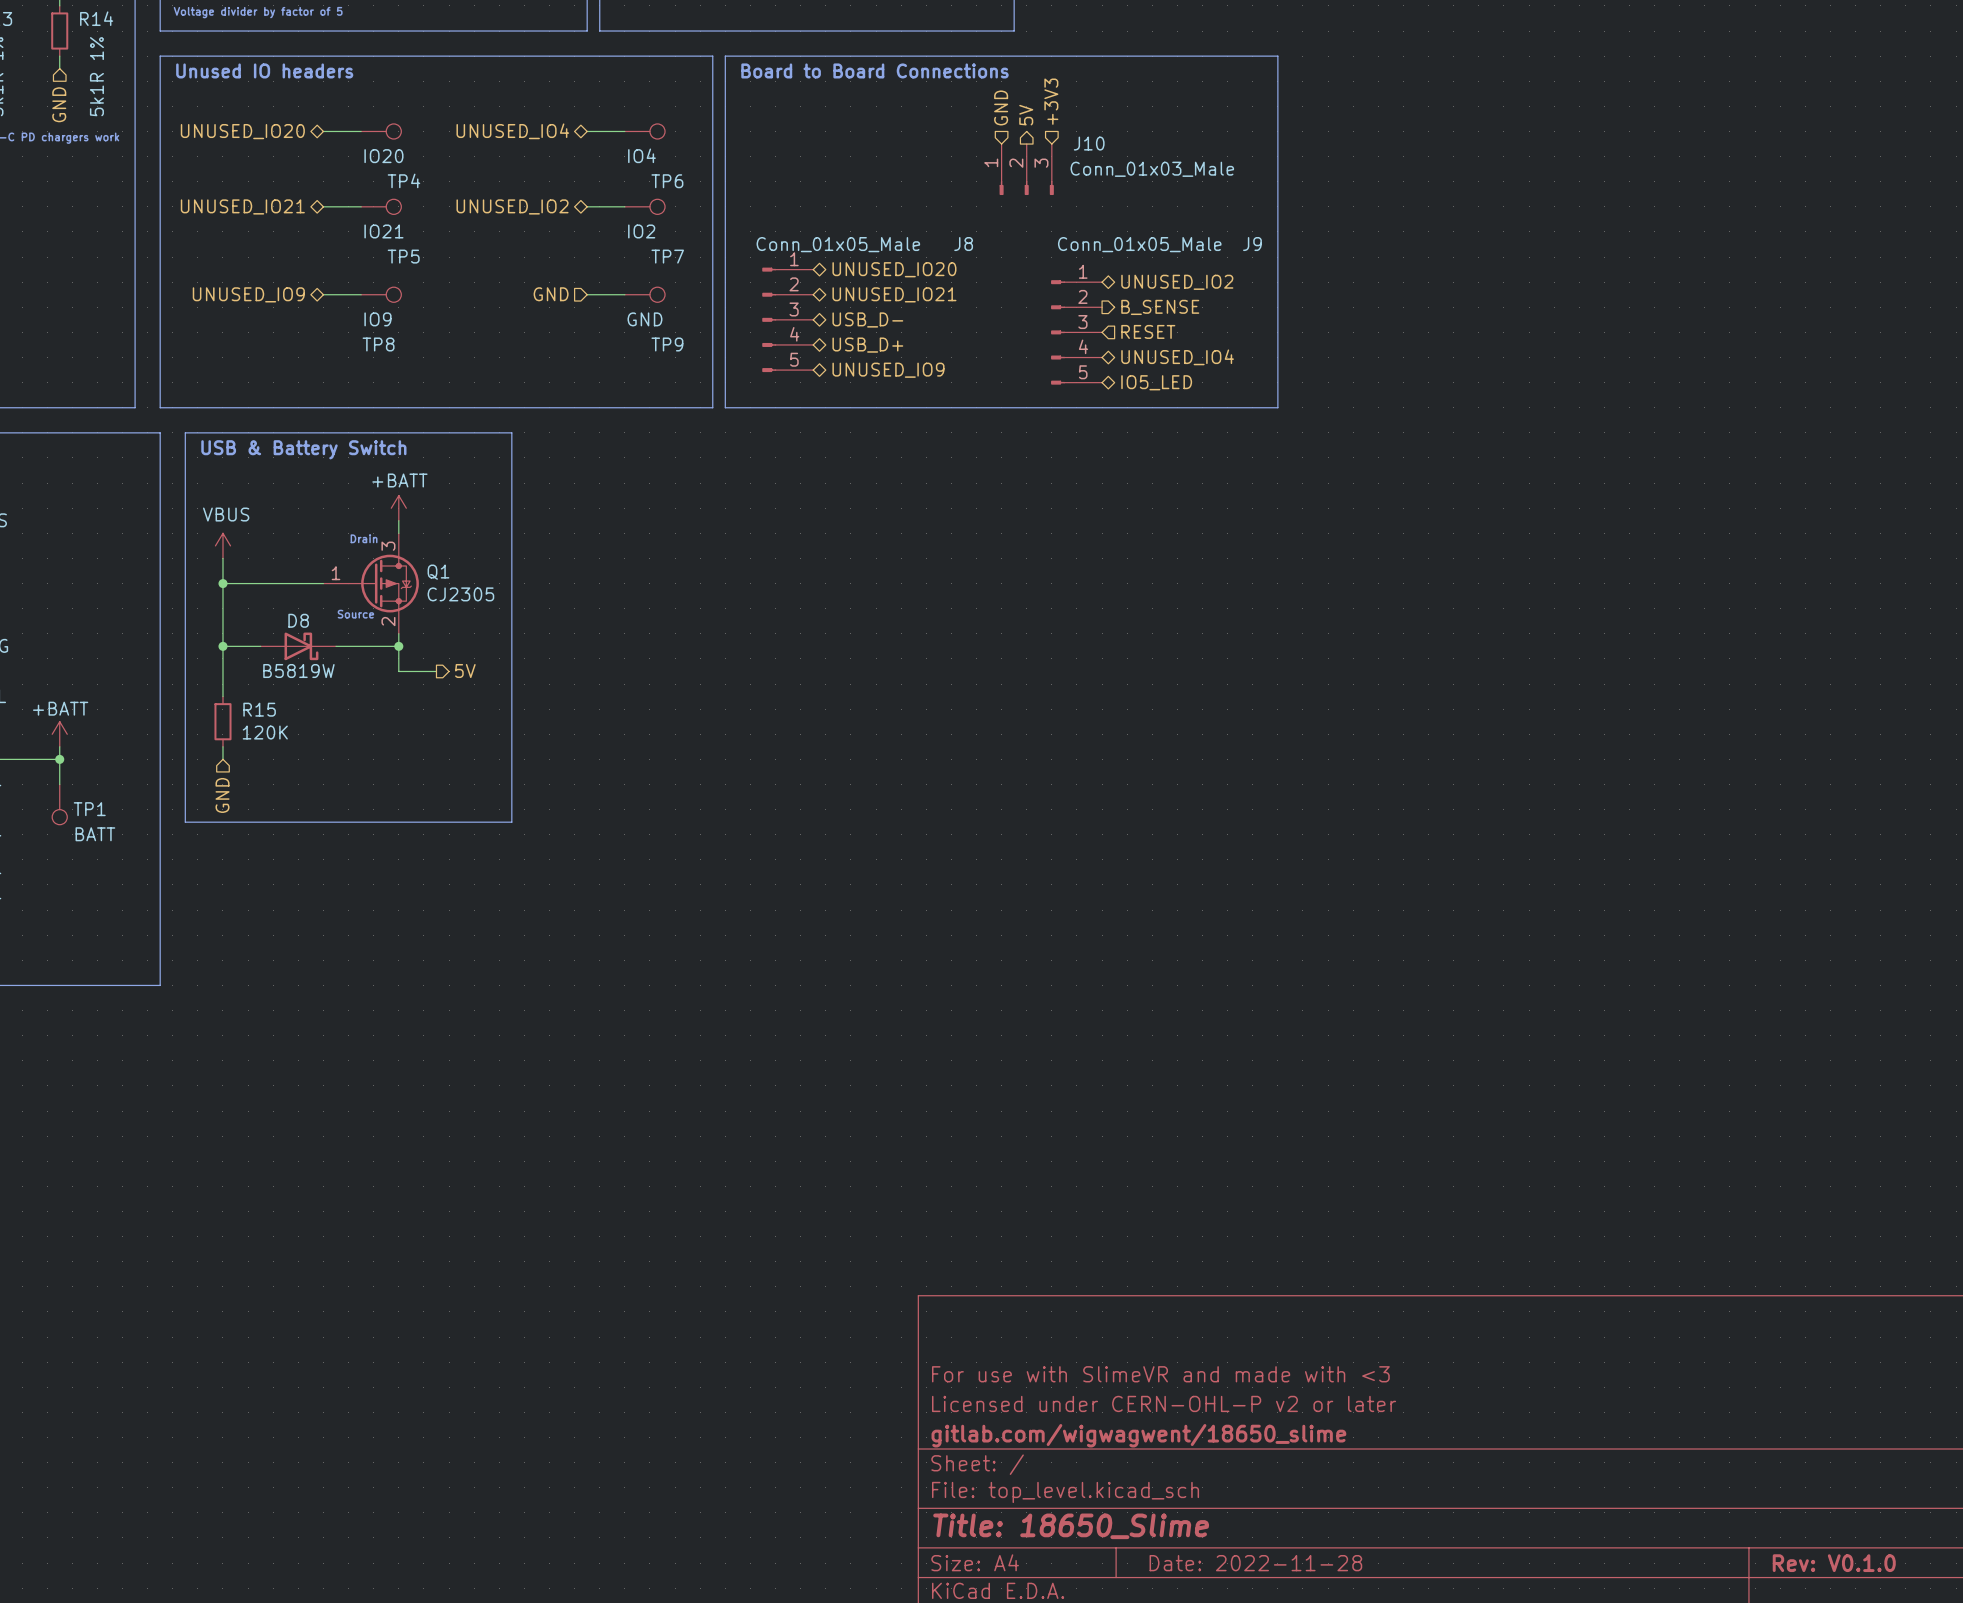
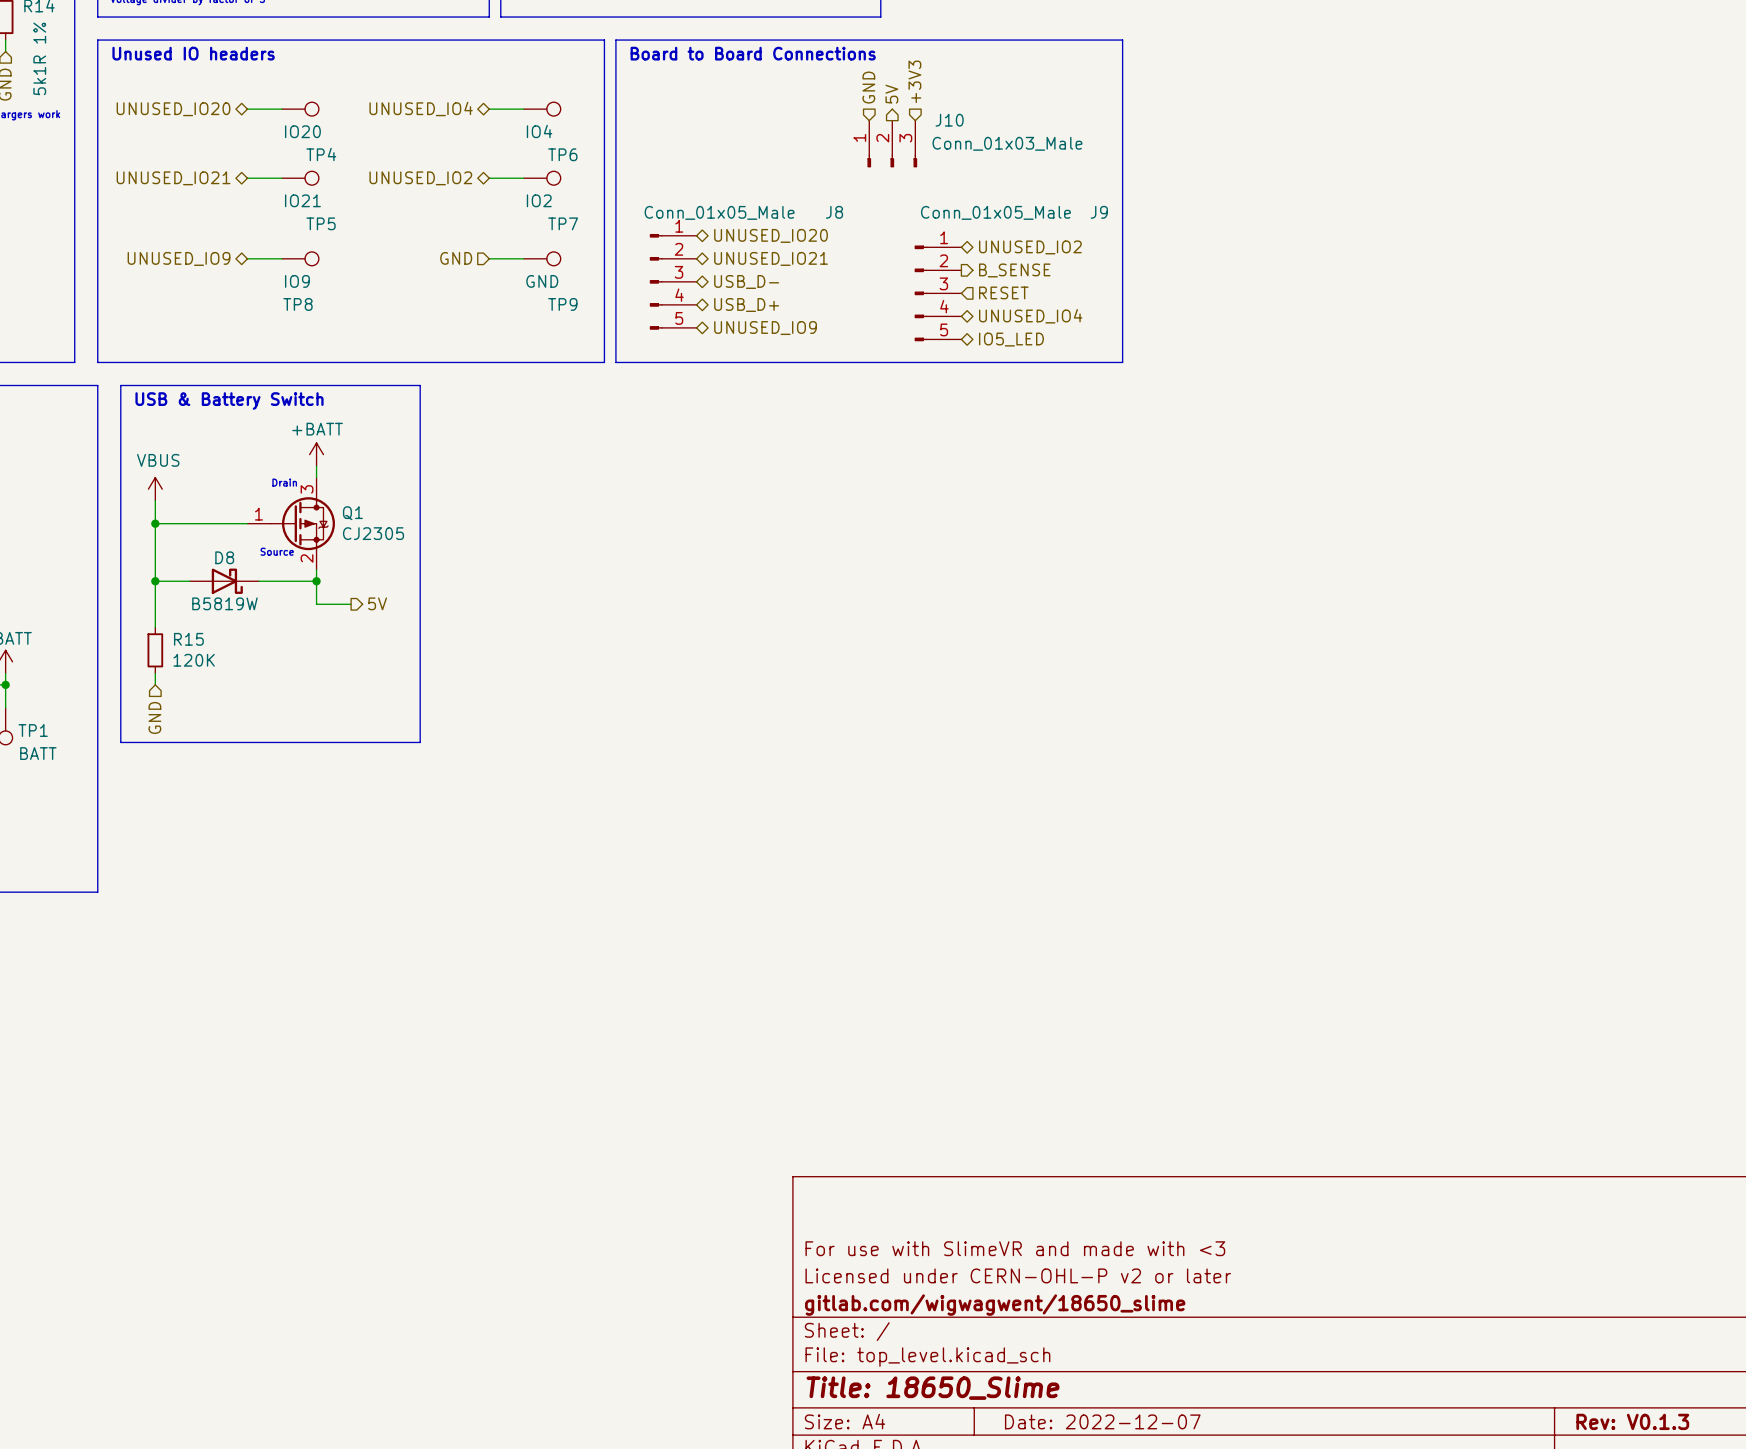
title block: Date: 2022-11-28 (1255, 1563) -> Date: 2022-12-07 (1102, 1421)
title block: Rev: V0.1.0 (1834, 1563) -> Rev: V0.1.3 (1632, 1421)

